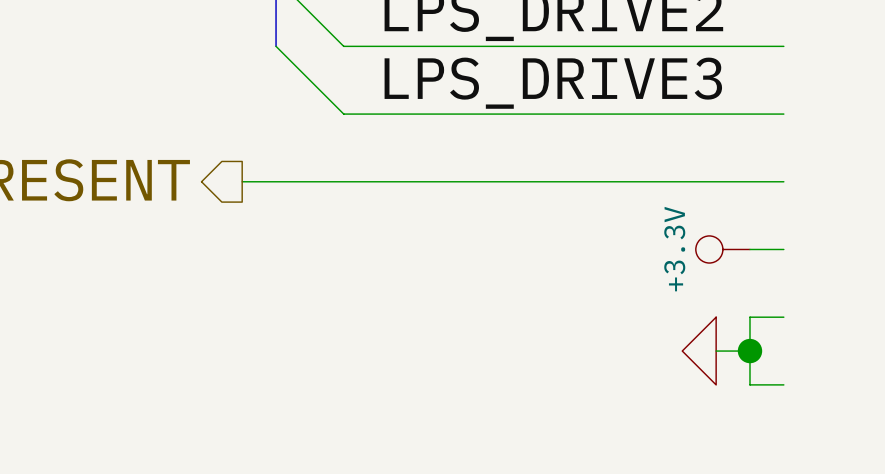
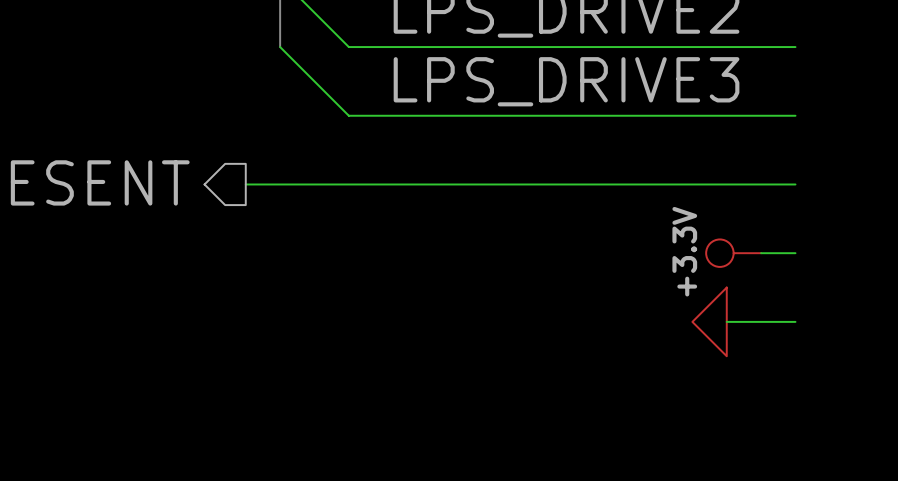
wire: (749, 317) (749, 384) (783, 384) -> (761, 321) (726, 321)
power symbol position: (699, 351) -> (709, 321)
wire: (716, 351) (749, 351) -> none
junction: (749, 351) -> none

